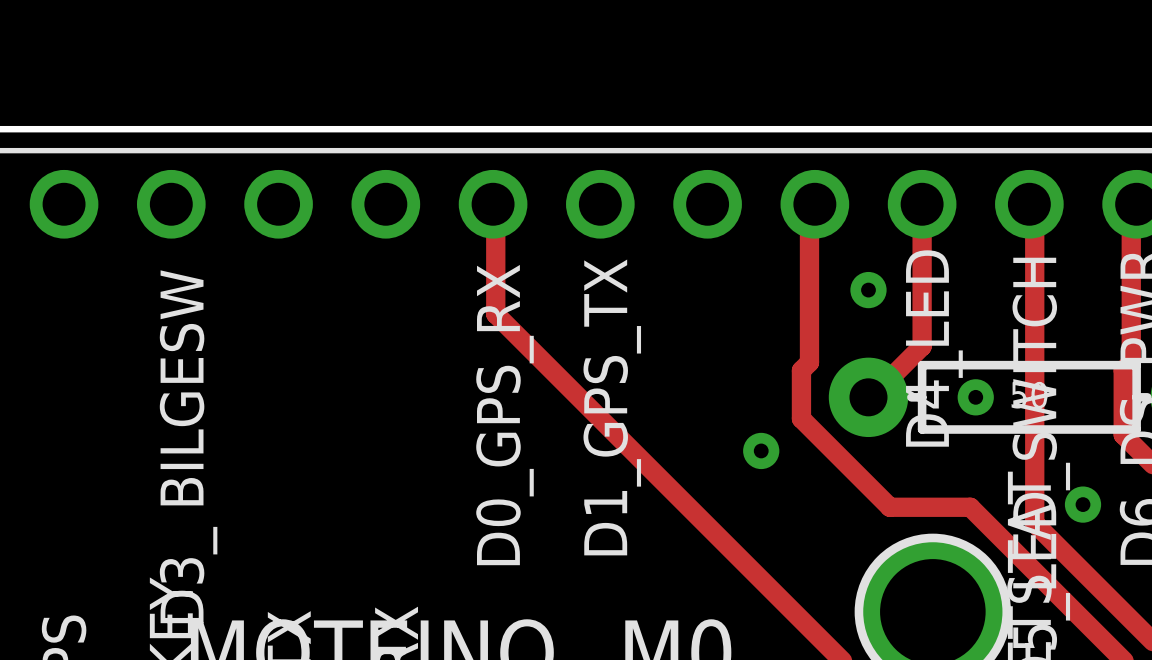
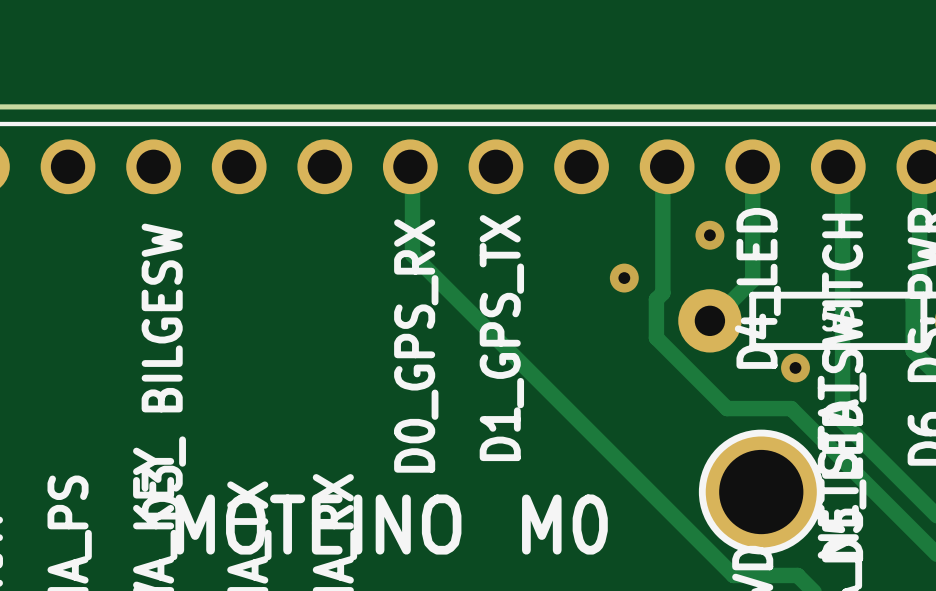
via: none -> (624, 278)
via: (975, 397) -> none
via: (761, 450) -> none
via: none -> (795, 367)
via: (1083, 504) -> none

